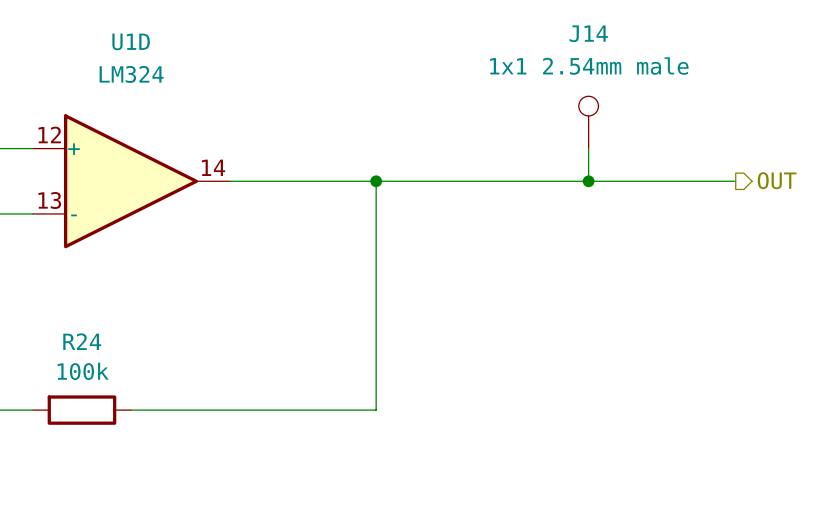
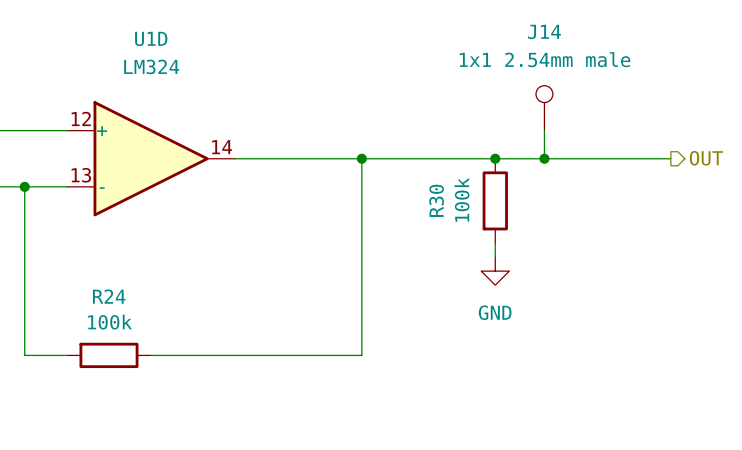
junction: none -> (495, 158)
R30: none -> 100k (495, 200)
wire: none -> (495, 243) (495, 257)
power symbol: none -> GND (495, 271)

